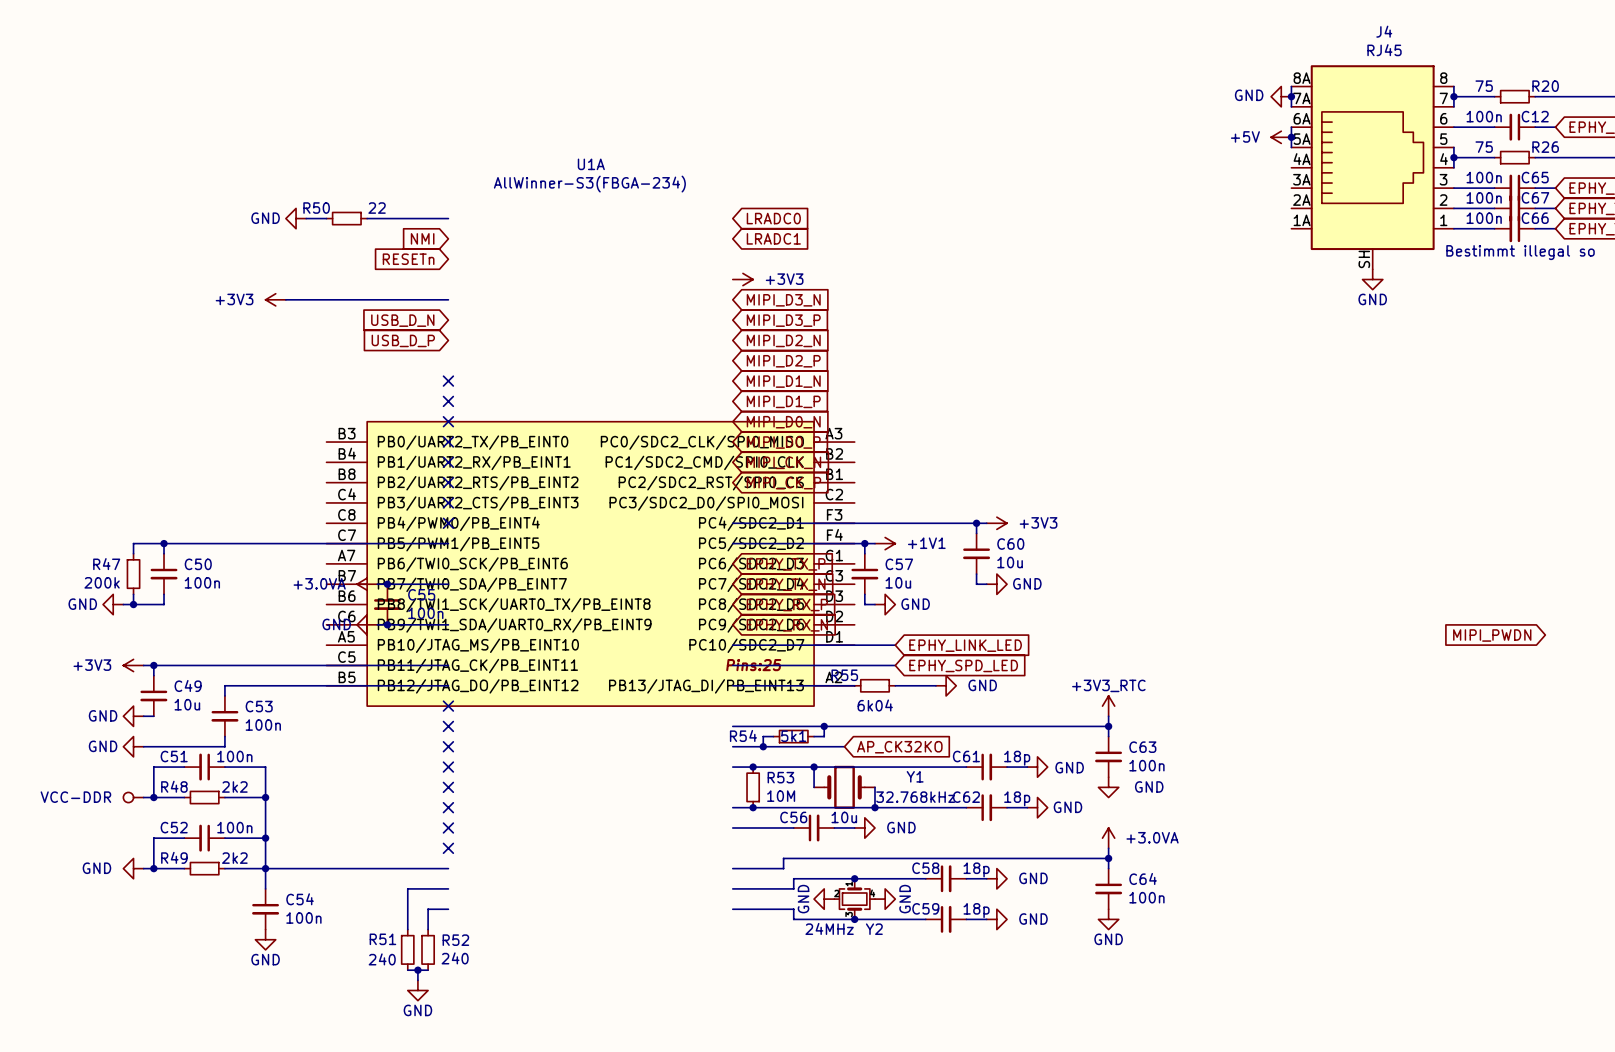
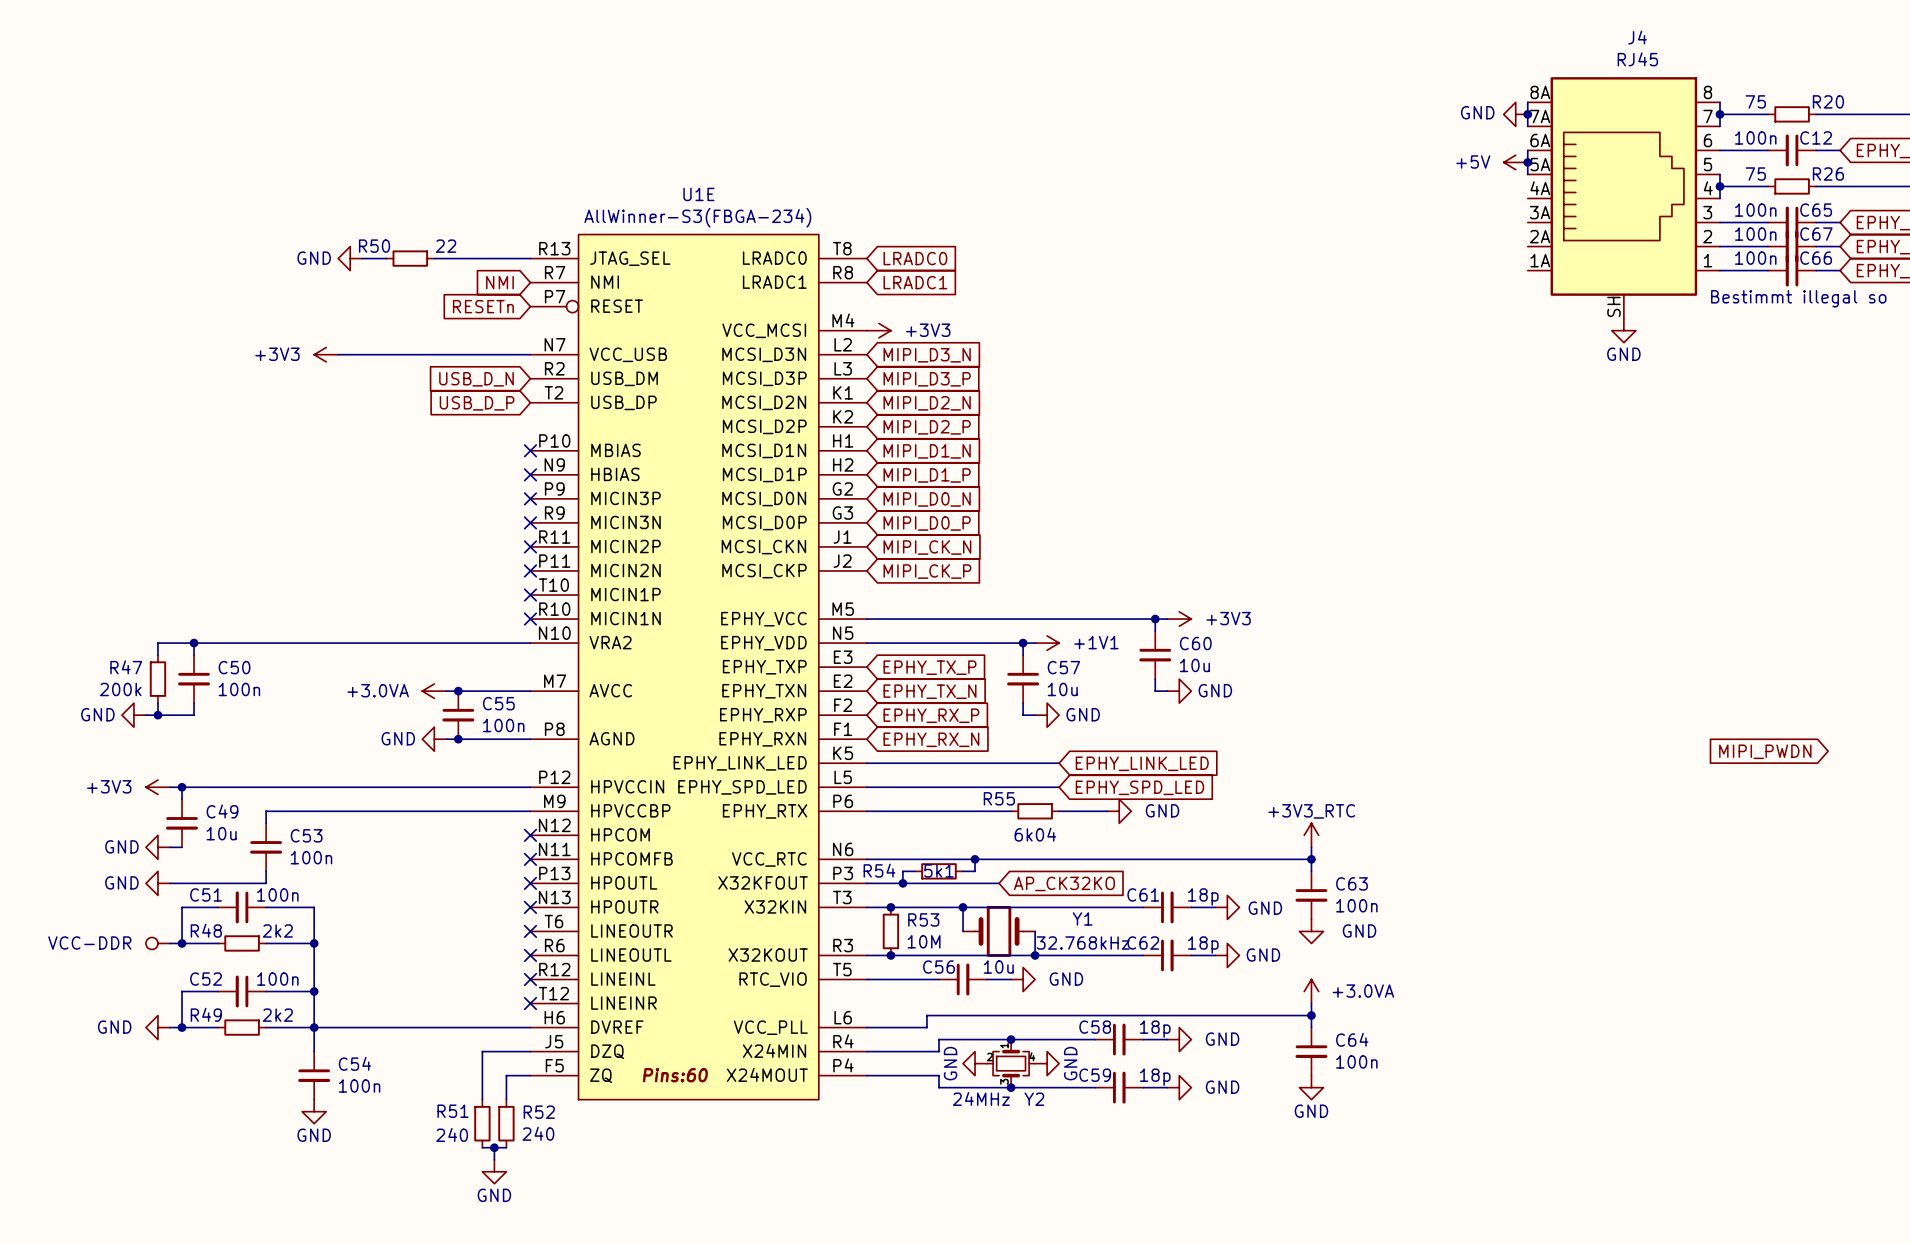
U1A: AllWinner-S3(FBGA-234) (590, 563) -> none
U1E: none -> AllWinner-S3(FBGA-234) (698, 667)

